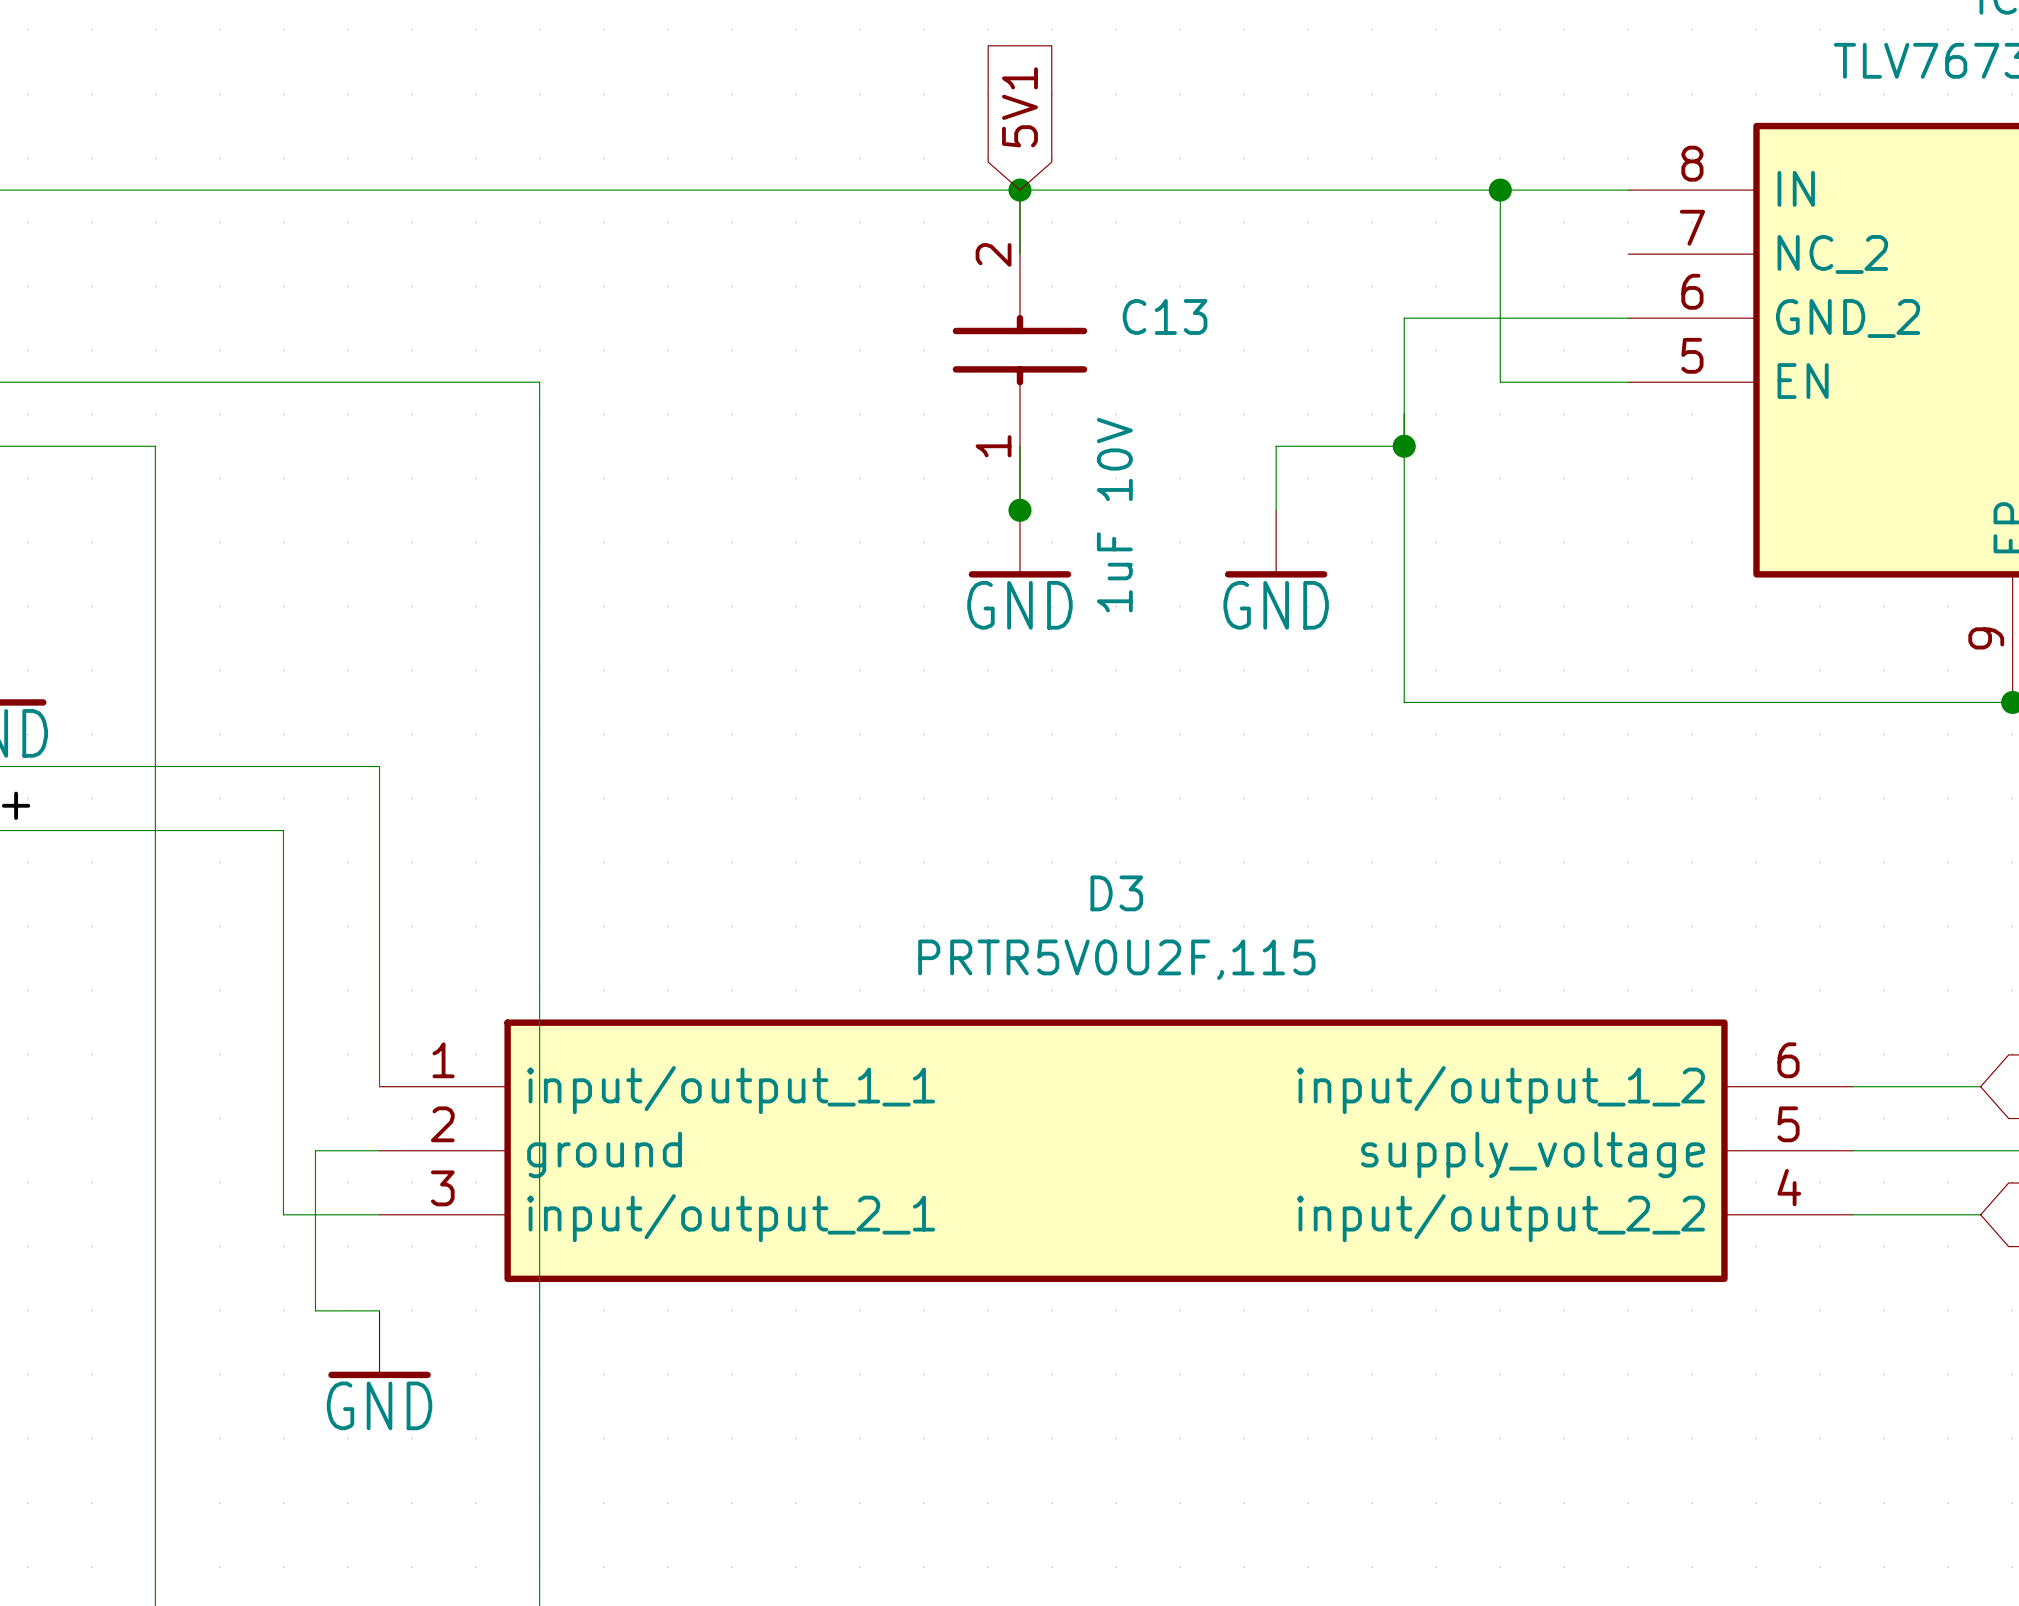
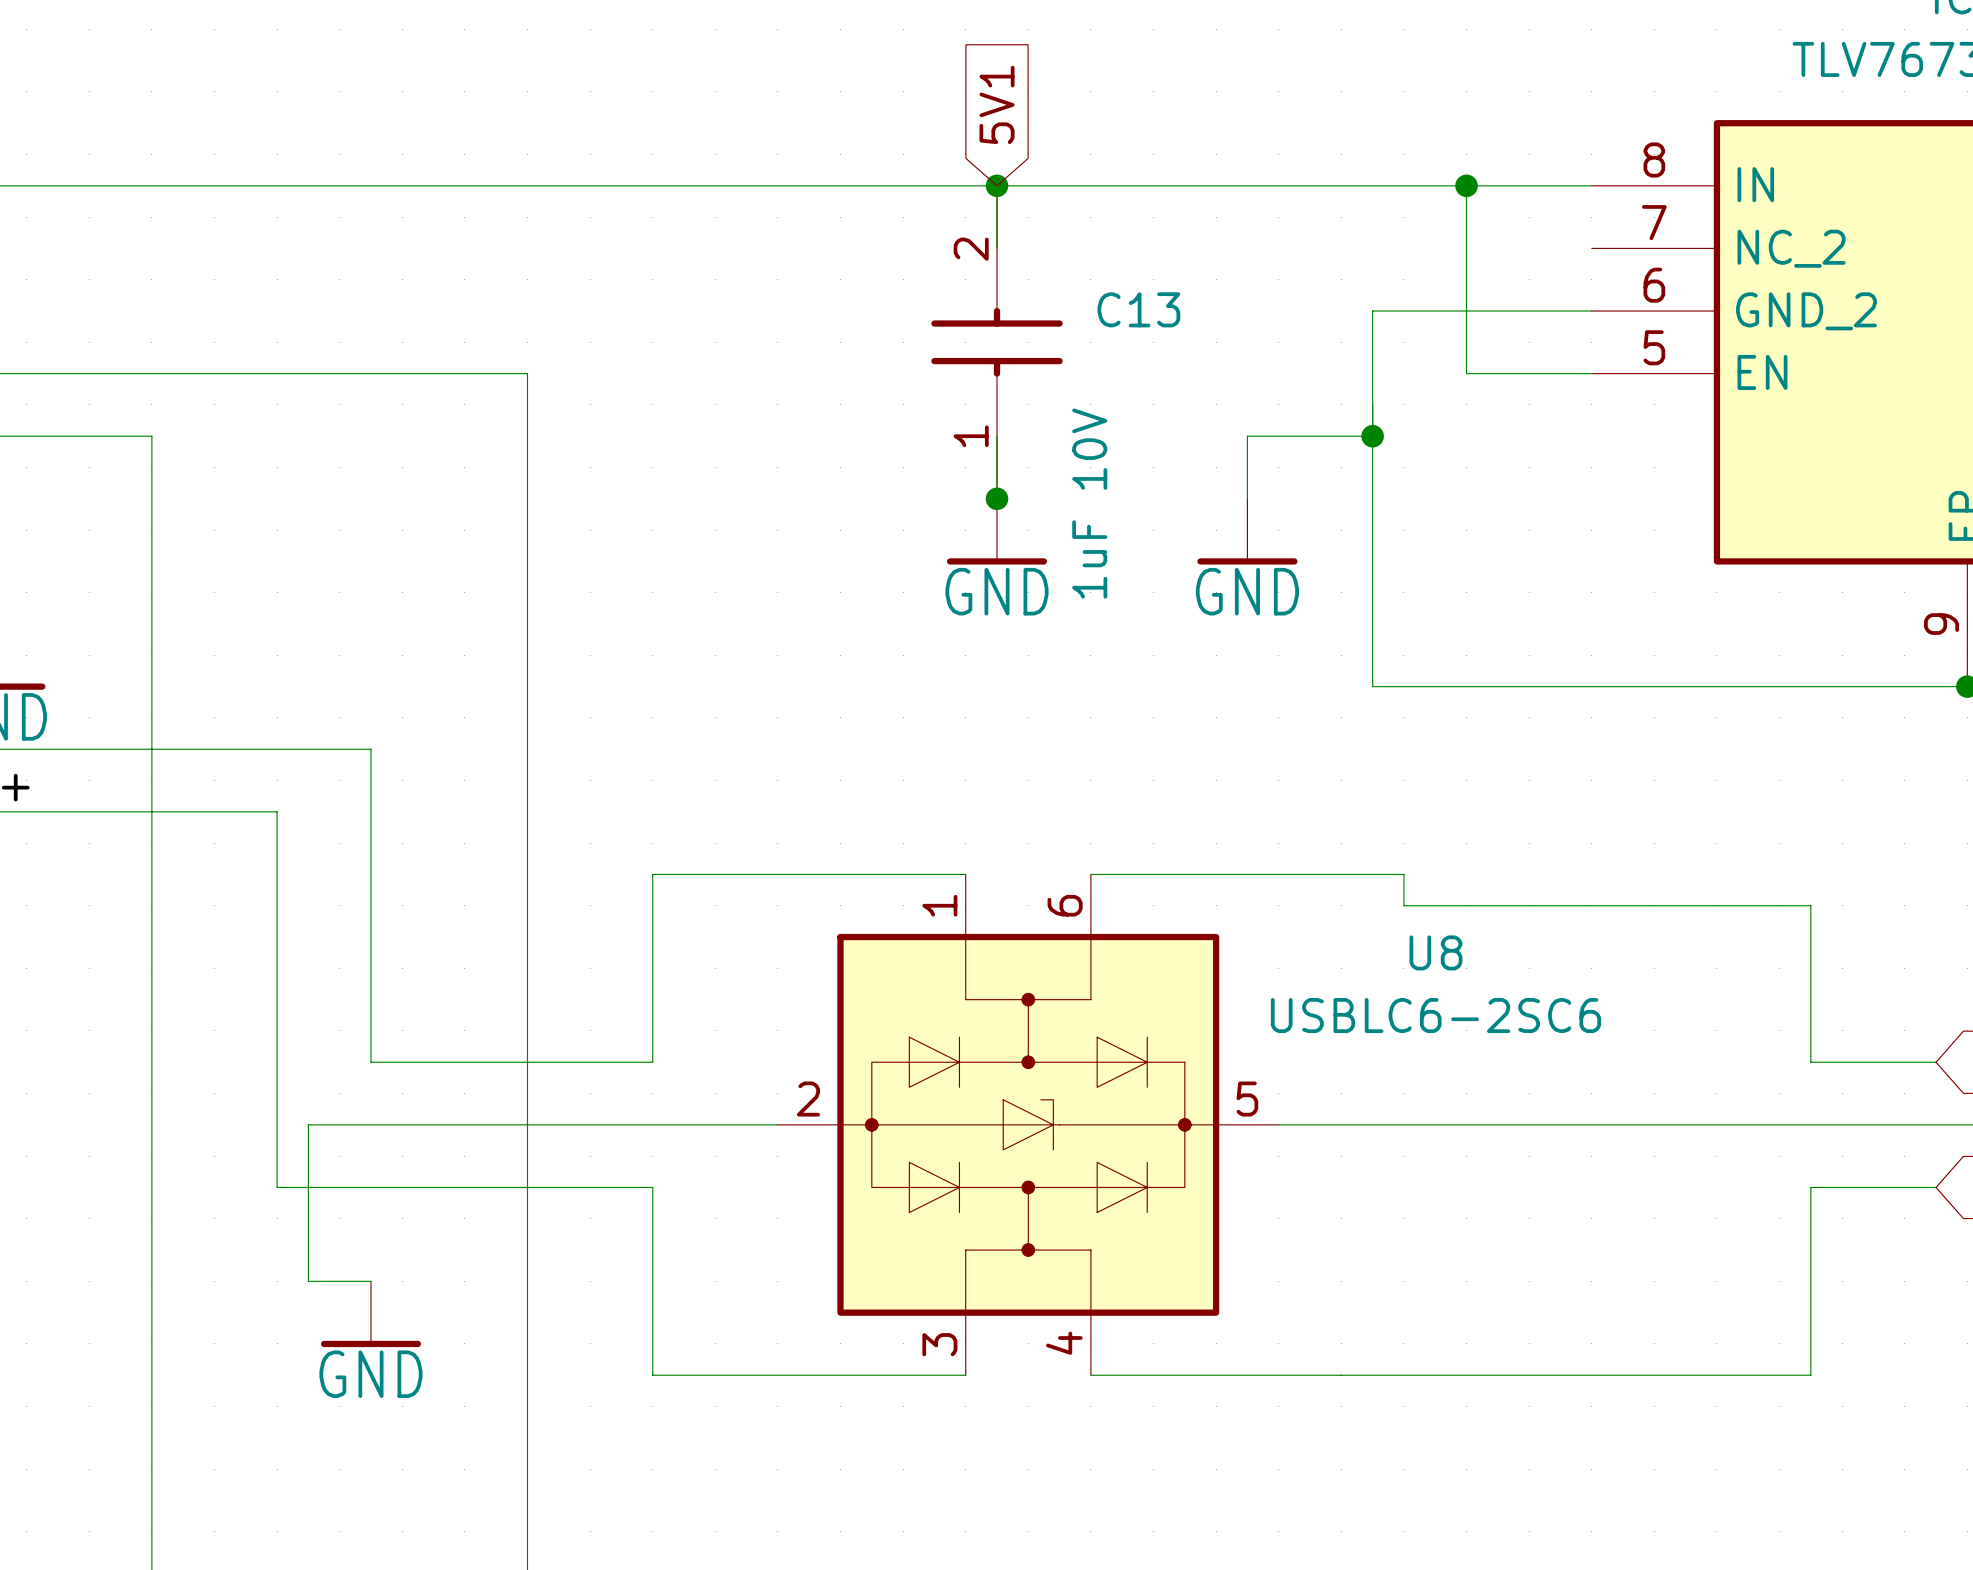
wire: none -> (965, 874) (652, 874) (652, 1062) (370, 1062)
wire: none -> (1090, 874) (1403, 874) (1403, 905) (1810, 905) (1810, 1062)
U8: none -> USBLC6-2SC6 (1028, 1124)
D3: PRTR5V0U2F,115 (1116, 1150) -> none
wire: none -> (370, 1187) (652, 1187) (652, 1375) (965, 1375)
wire: none -> (1810, 1187) (1810, 1375) (1090, 1375)

